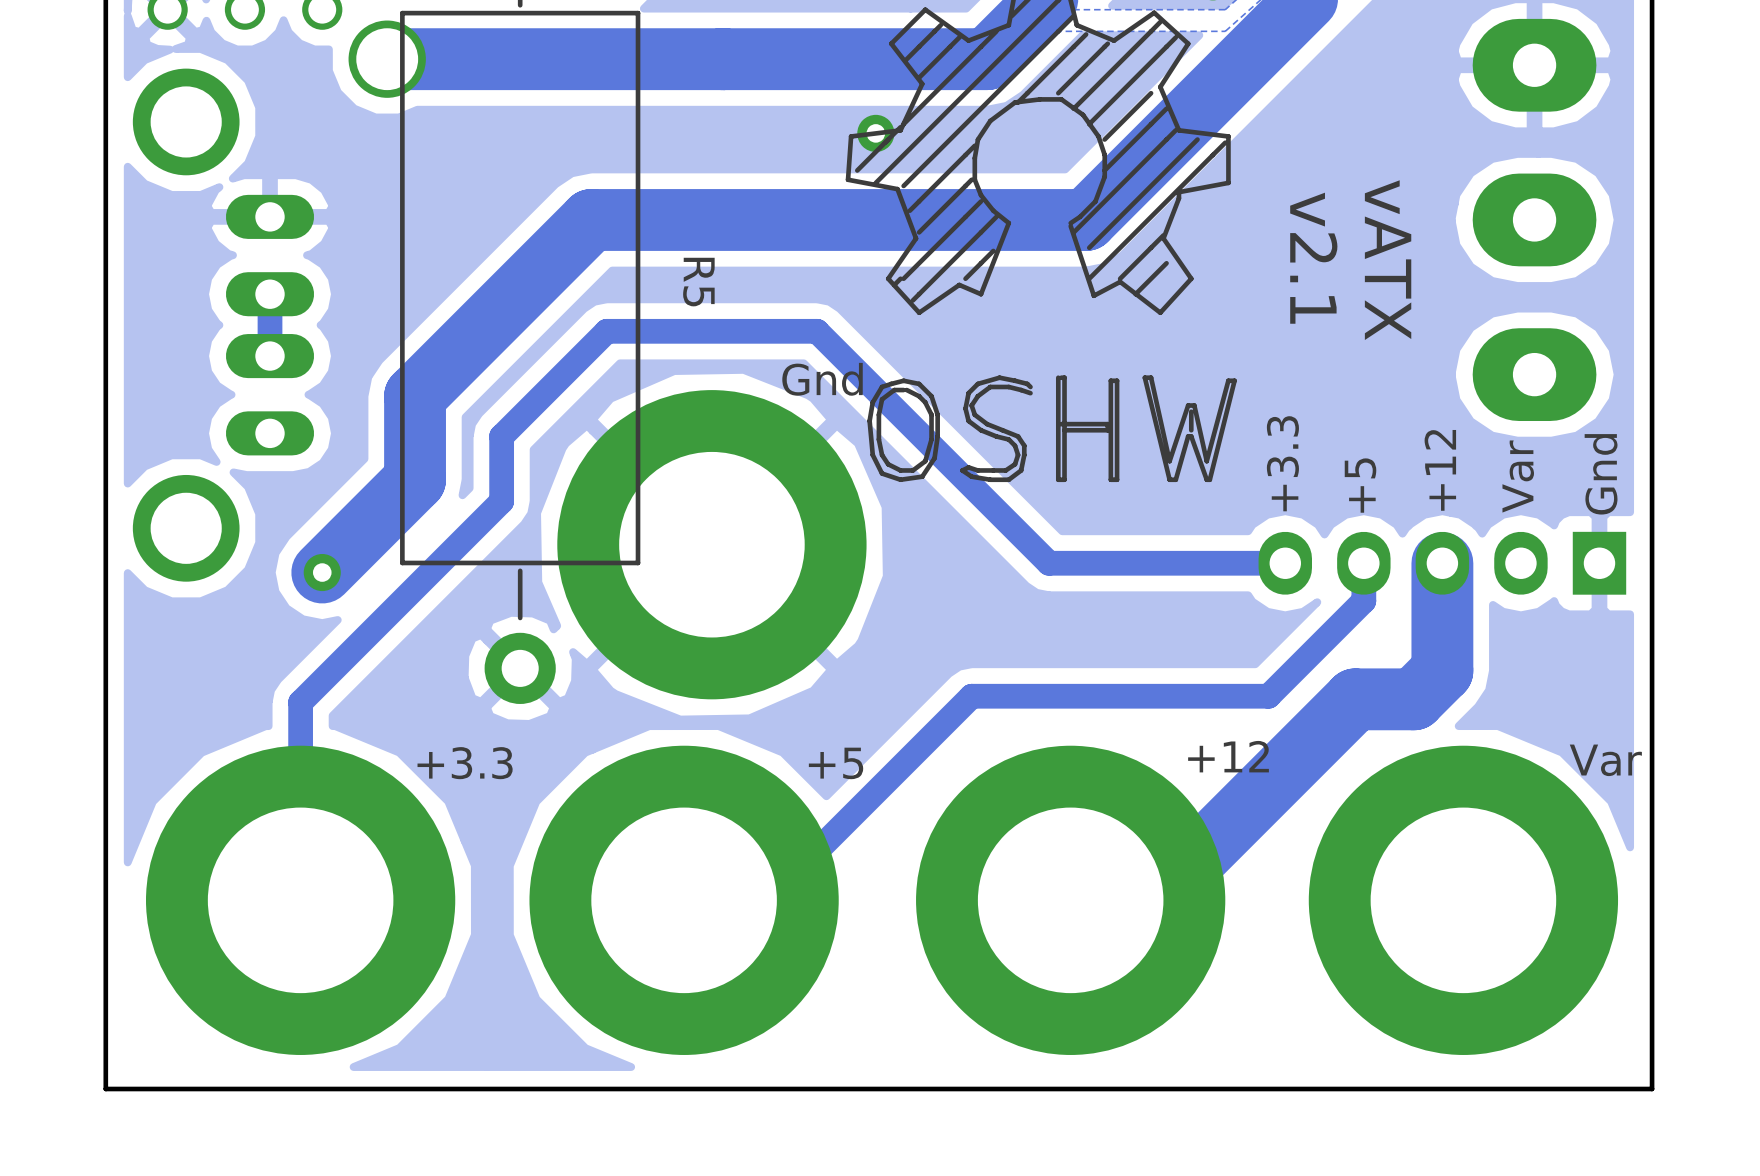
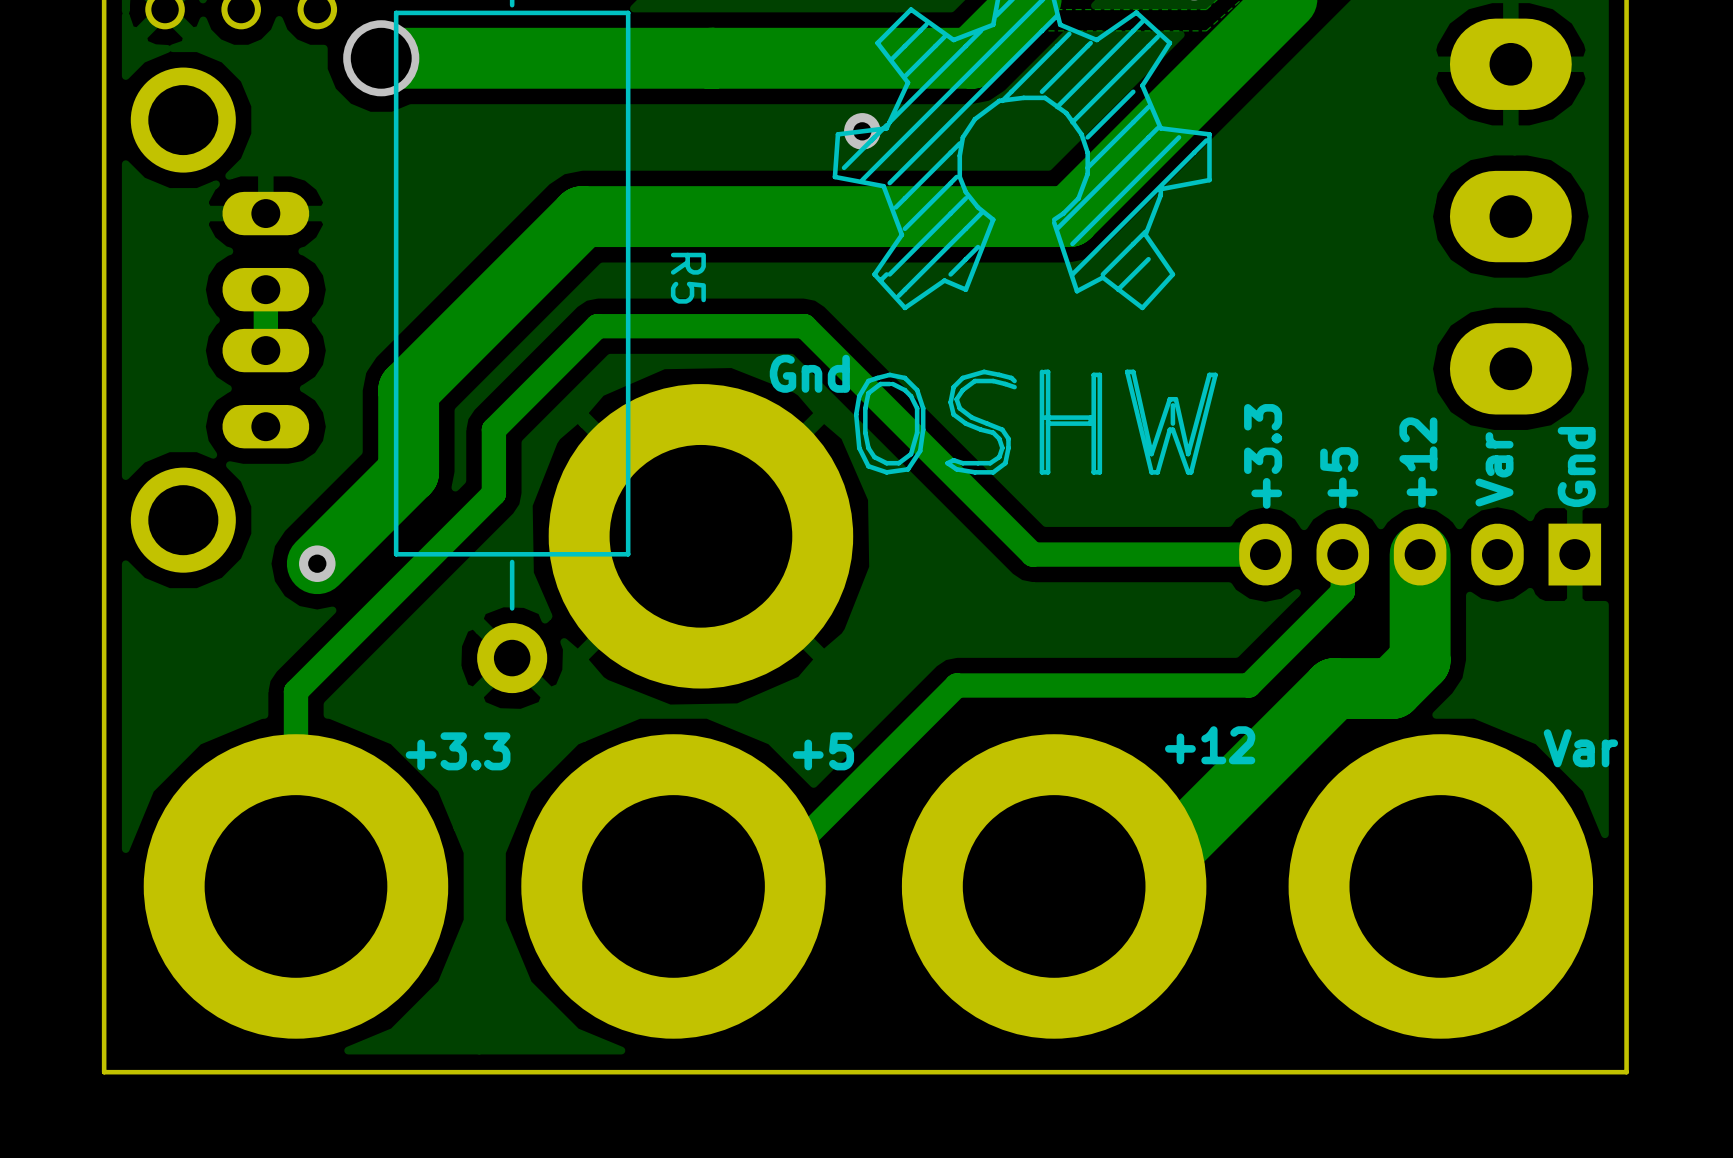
text: v2.1 (1313, 258) -> none
text: vATX (1388, 260) -> none

